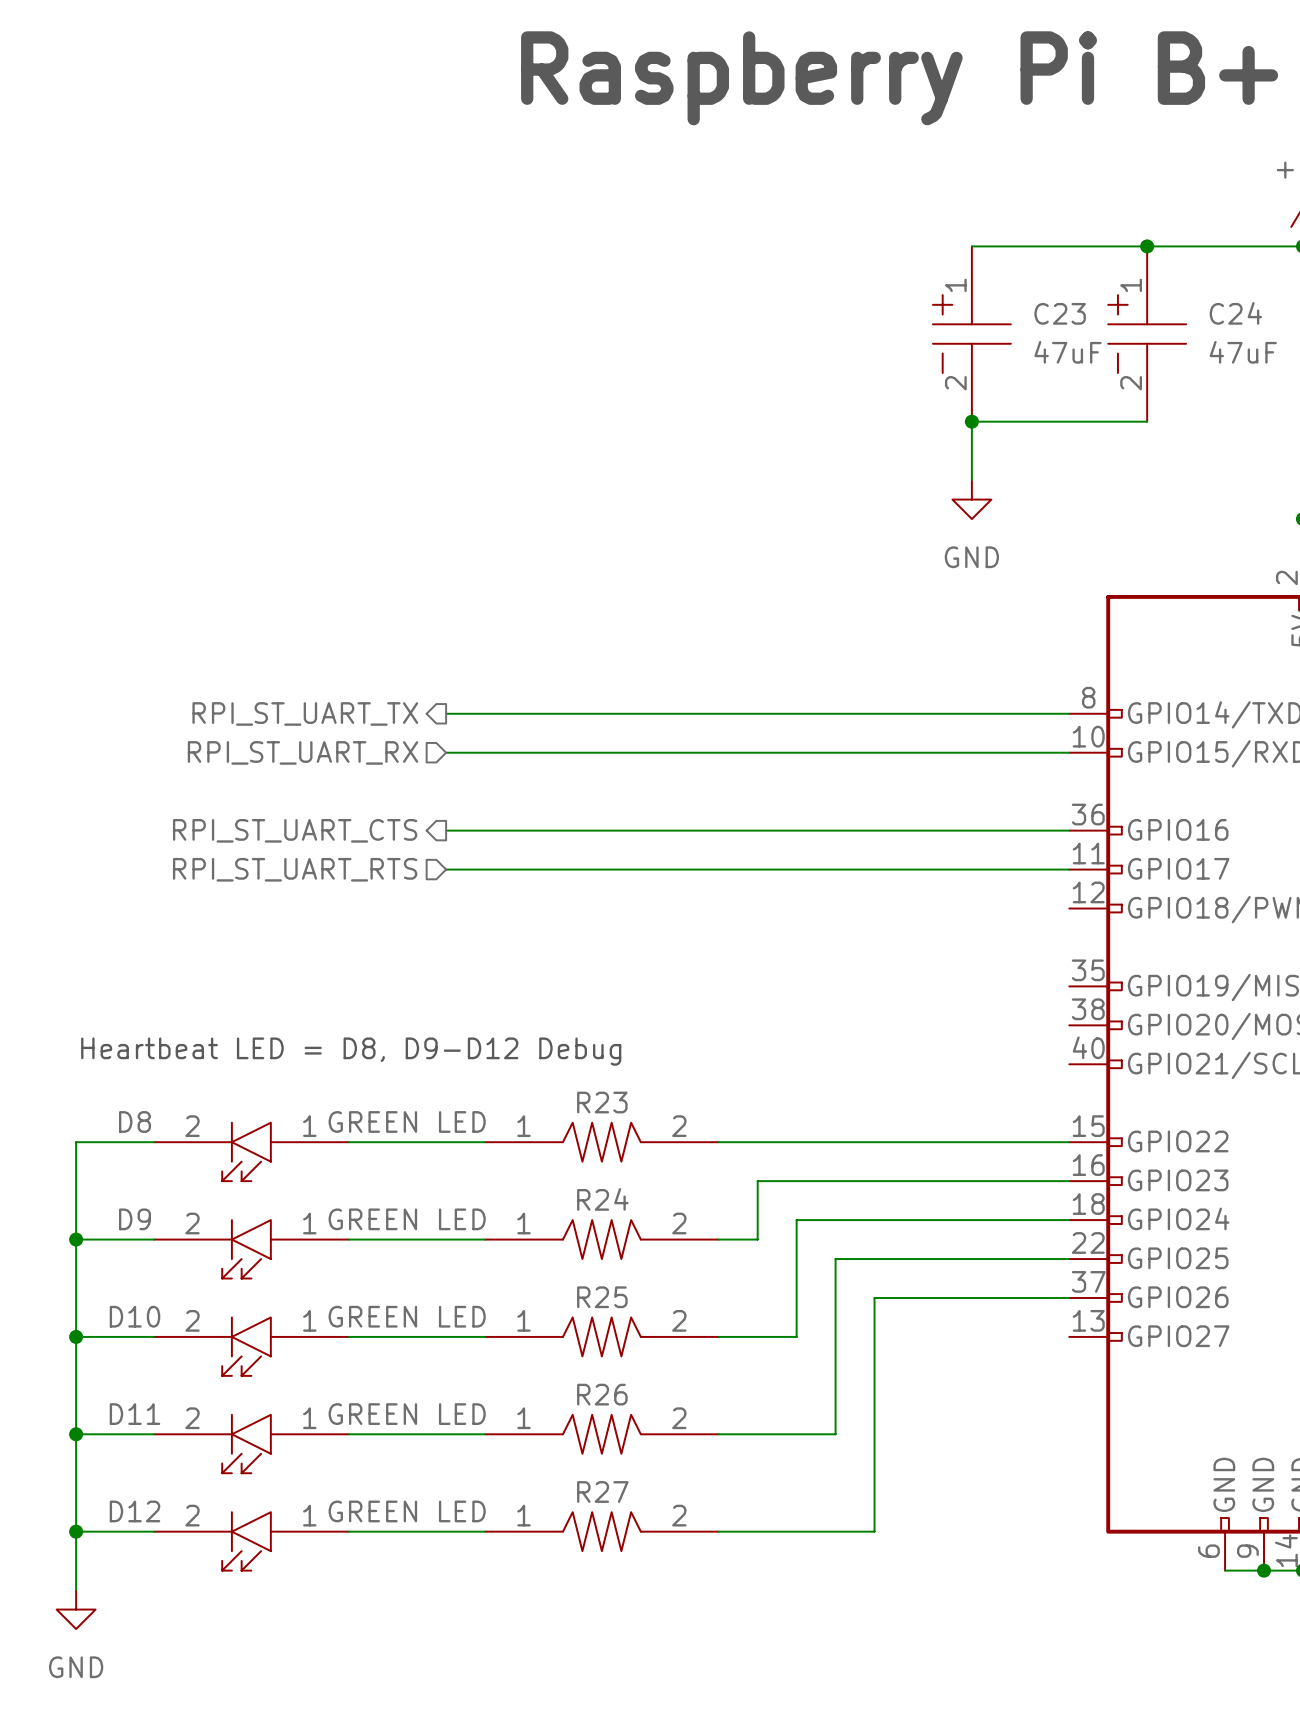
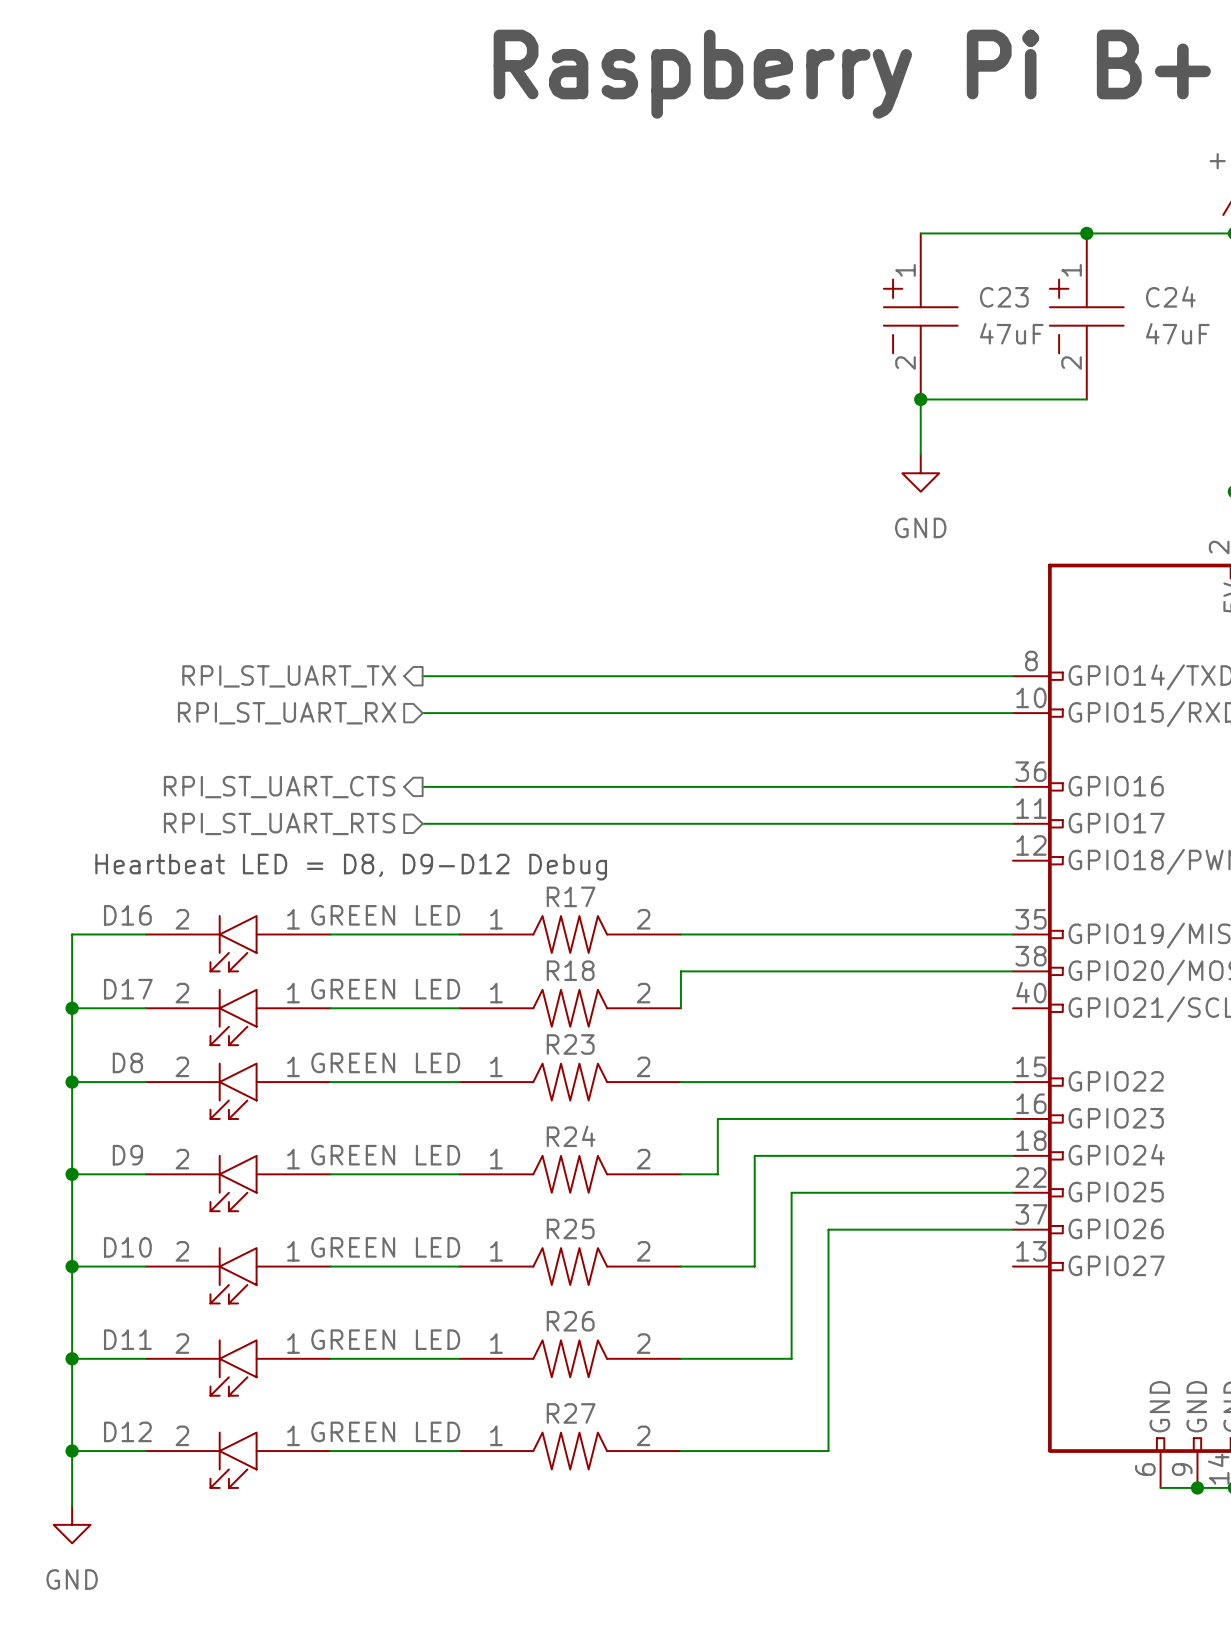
wire: none -> (145, 934) (72, 934) (72, 1082)
wire: none -> (330, 934) (459, 934)
R17: none -> (570, 934)
wire: none -> (680, 934) (1012, 934)
D16: none -> (238, 943)
wire: none -> (1012, 971) (680, 971) (680, 1008)
text position: Heartbeat LED = D8, D9-D12 Debug (351, 1051) -> Heartbeat LED = D8, D9-D12 Debug (351, 867)
wire: none -> (72, 1008) (145, 1008)
junction: none -> (72, 1008)
wire: none -> (330, 1008) (459, 1008)
R18: none -> (570, 1008)
D17: none -> (238, 1017)
junction: none -> (72, 1082)

